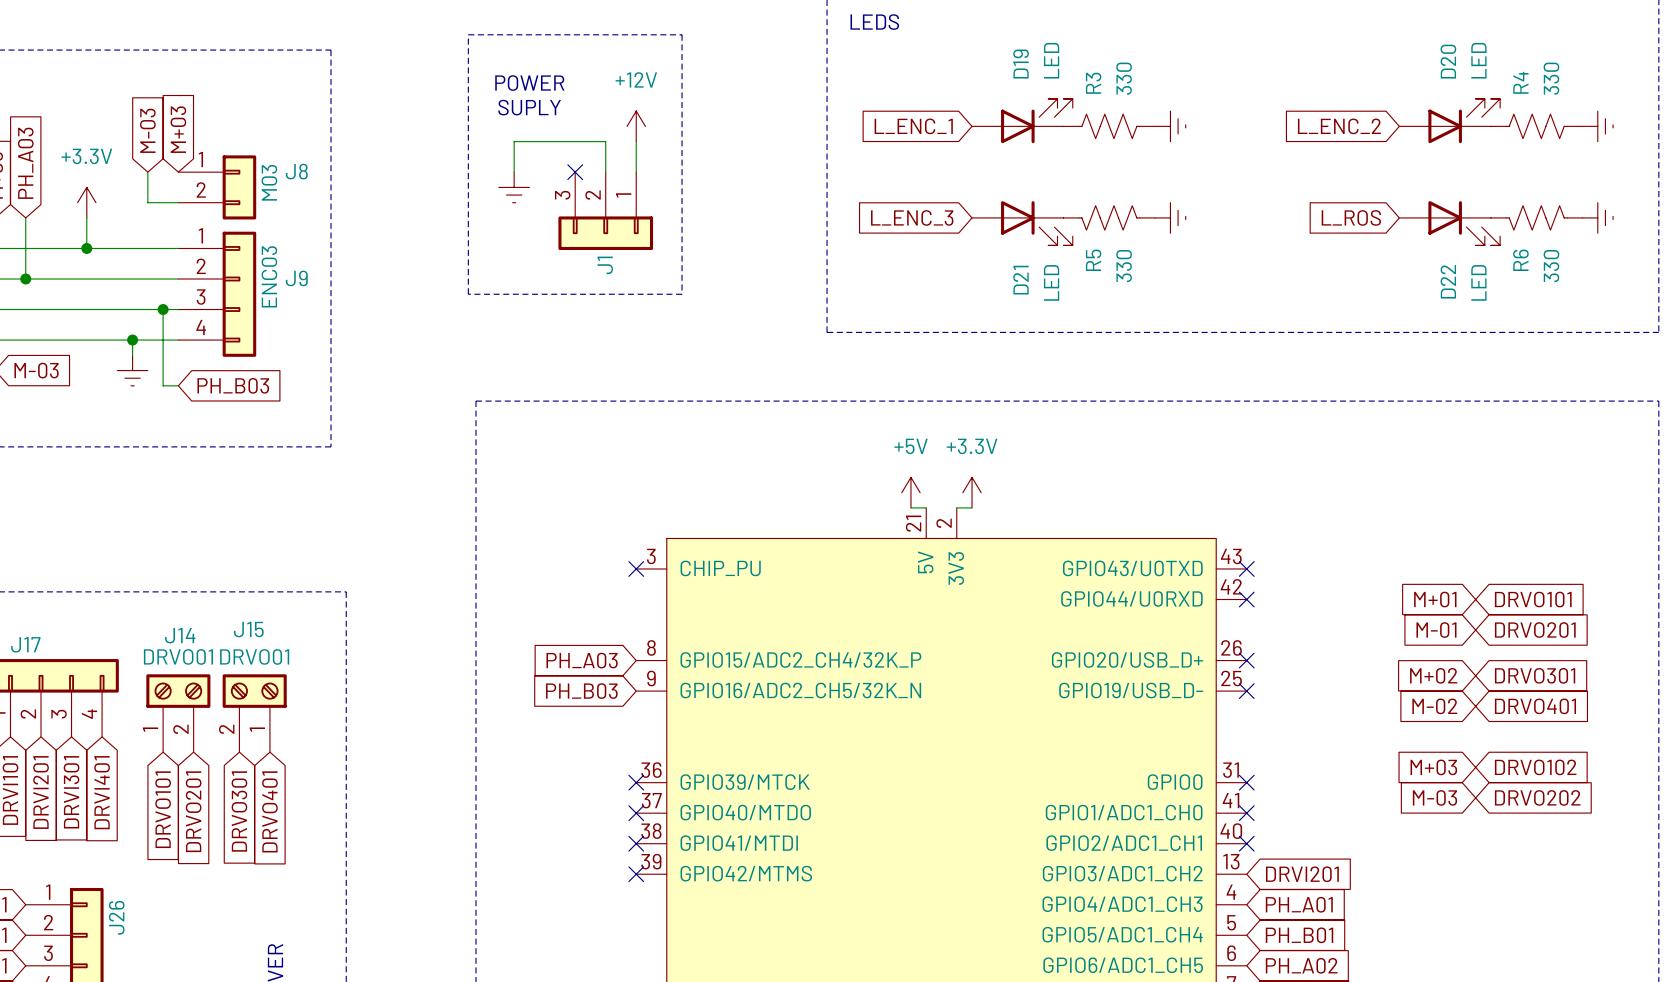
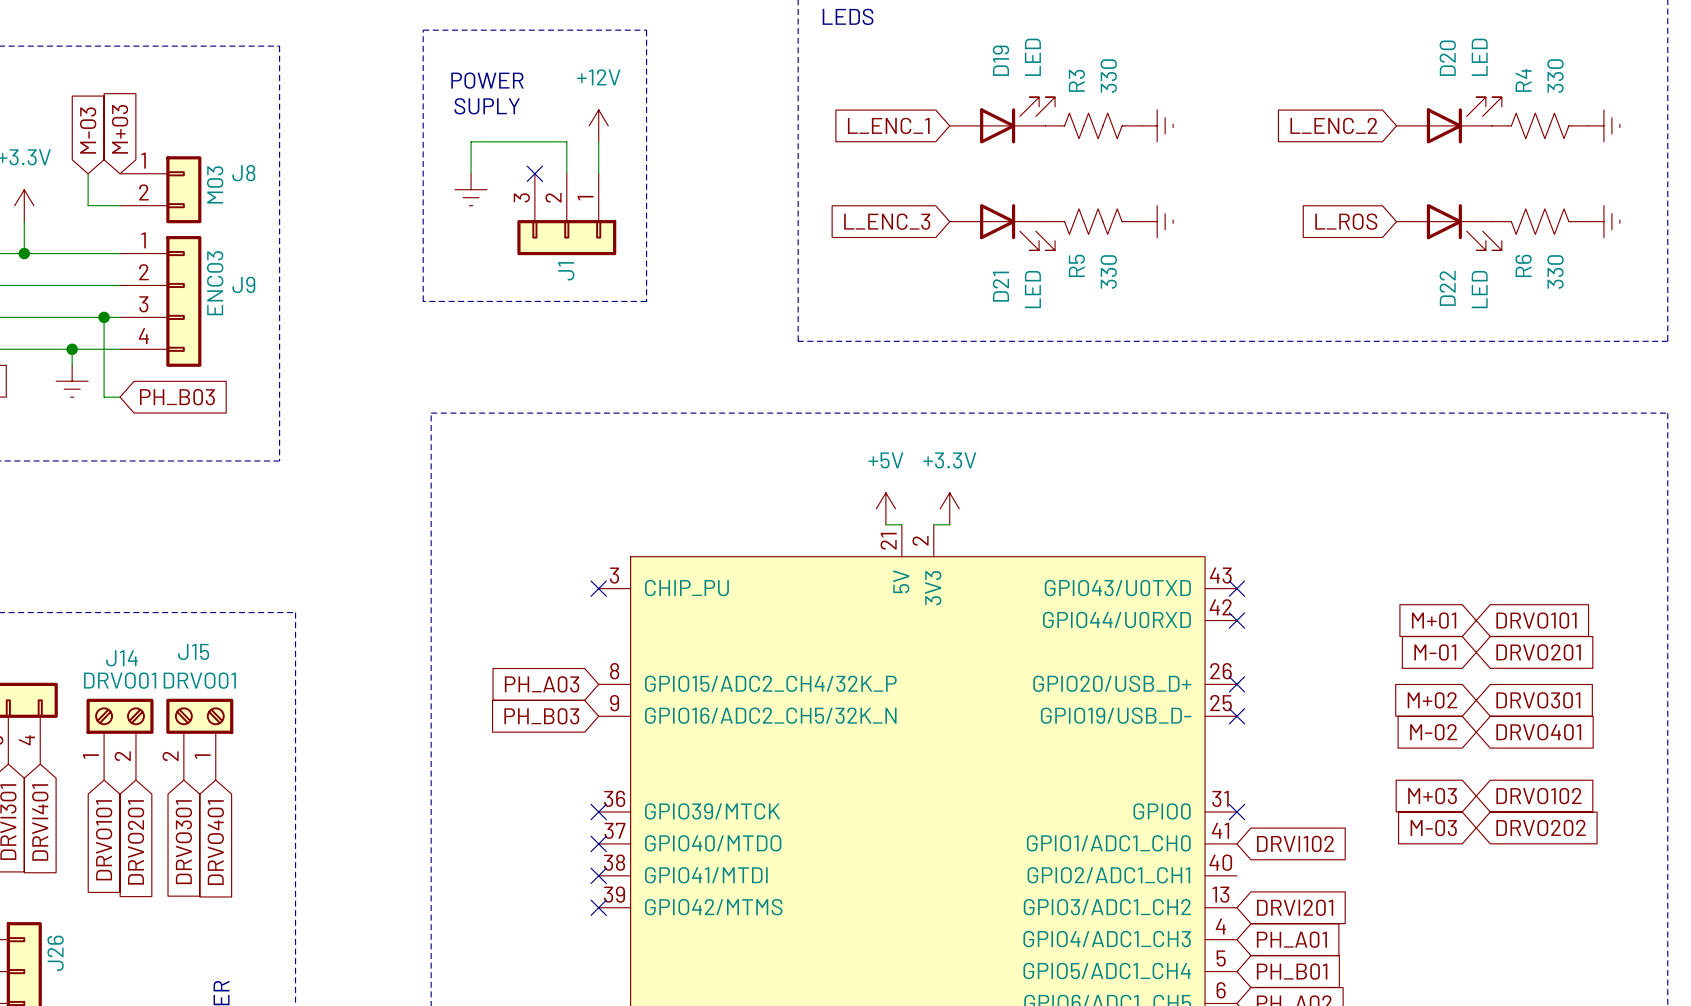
no-connect mark: (1246, 813) -> none
global label: none -> DRVI102 (1295, 843)
no-connect mark: (1246, 843) -> none

